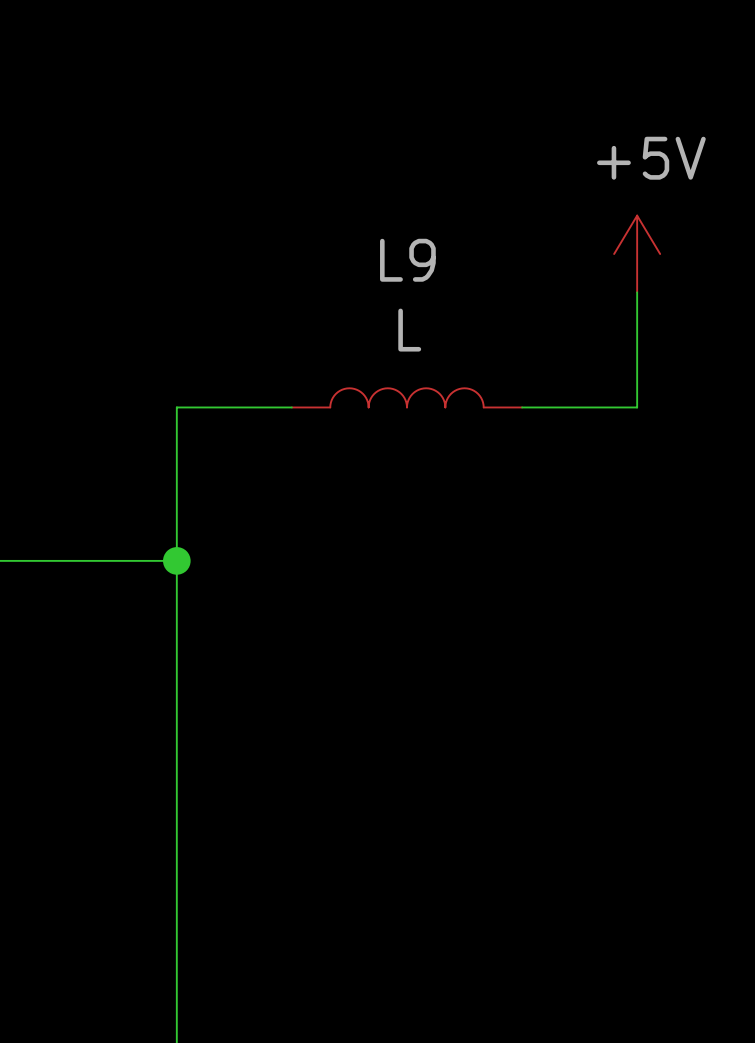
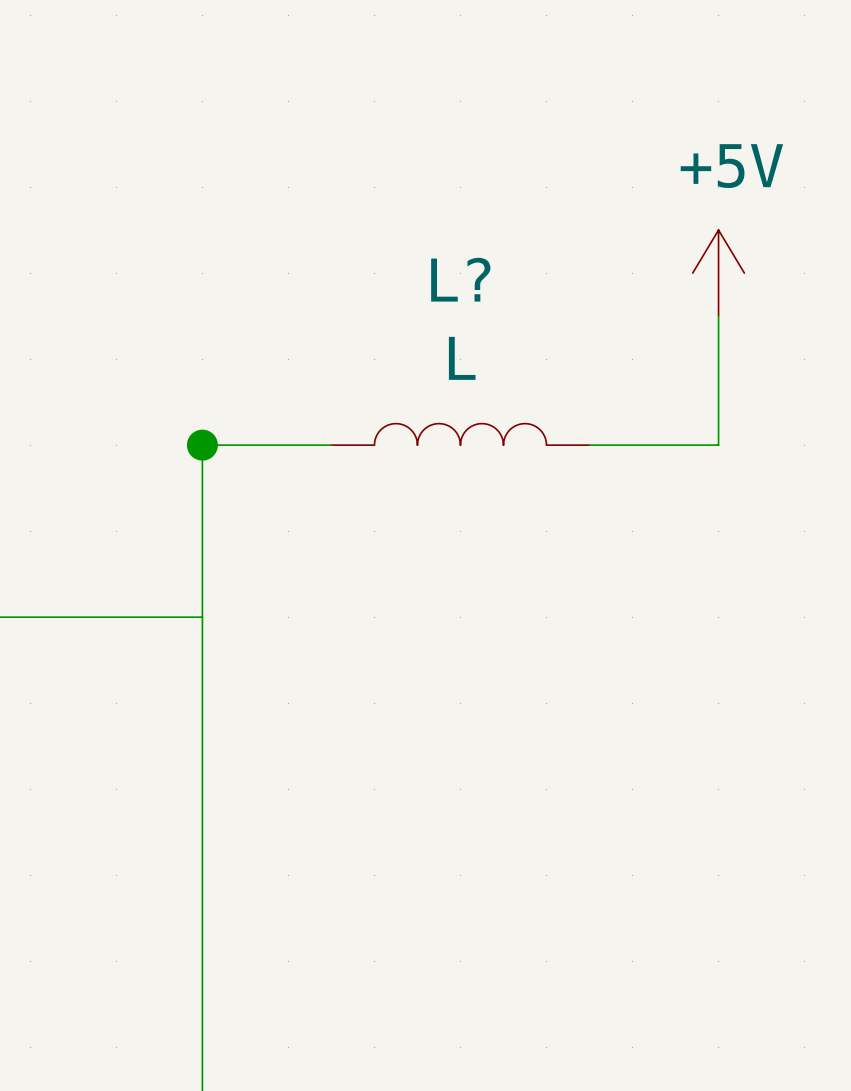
L9 name: L9 (407, 260) -> L? (460, 279)
junction position: (176, 560) -> (202, 445)

